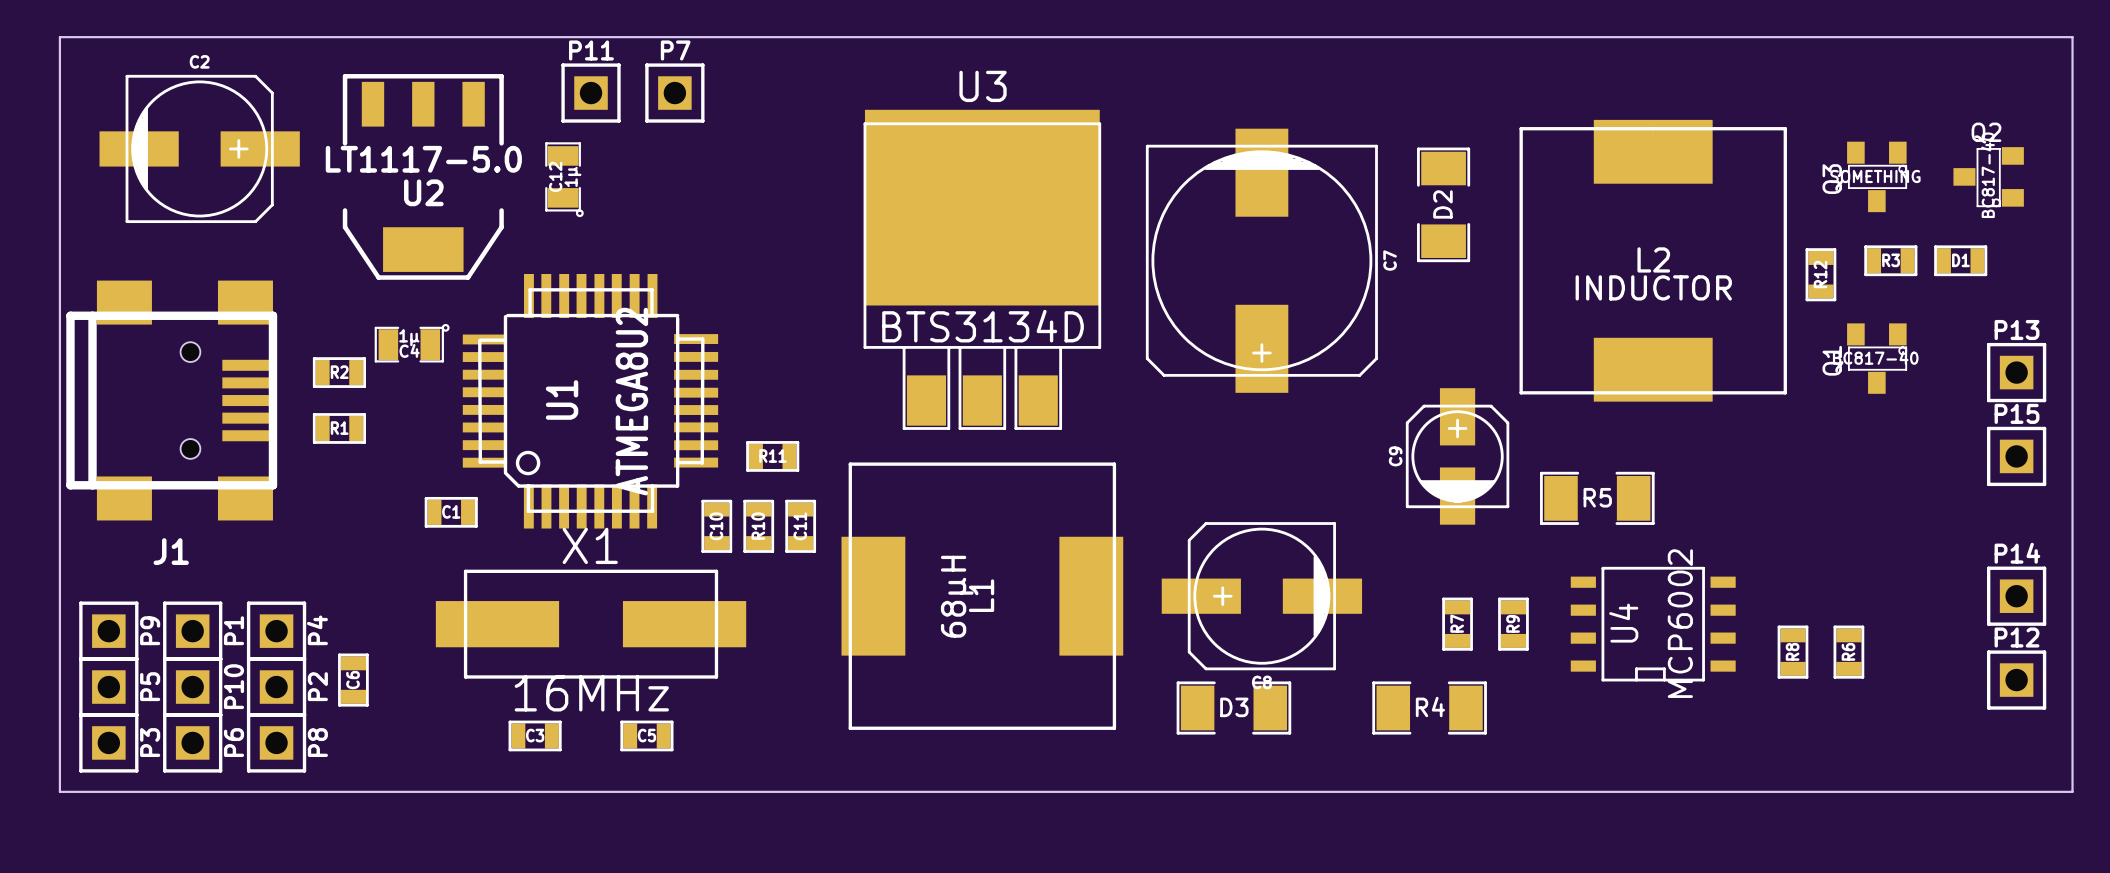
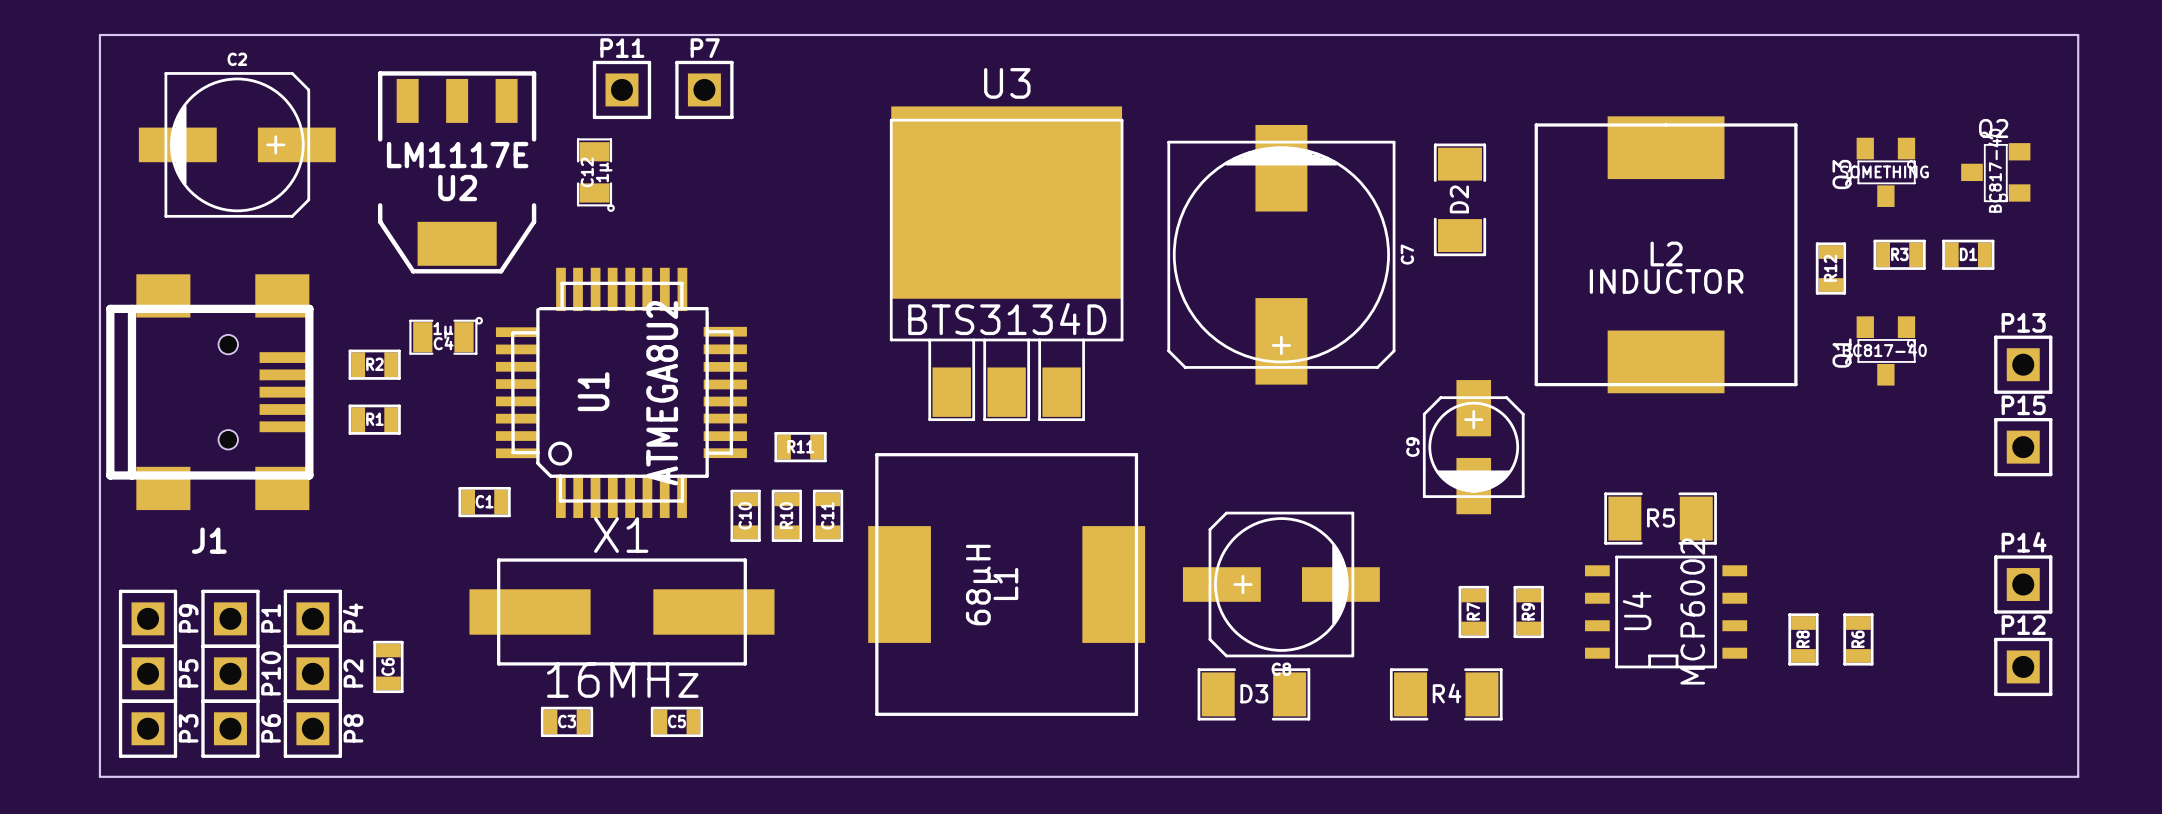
U2 value: LT1117-5.0 (423, 159) -> LM1117E (457, 155)
R5 position: (1597, 498) -> (1660, 518)

